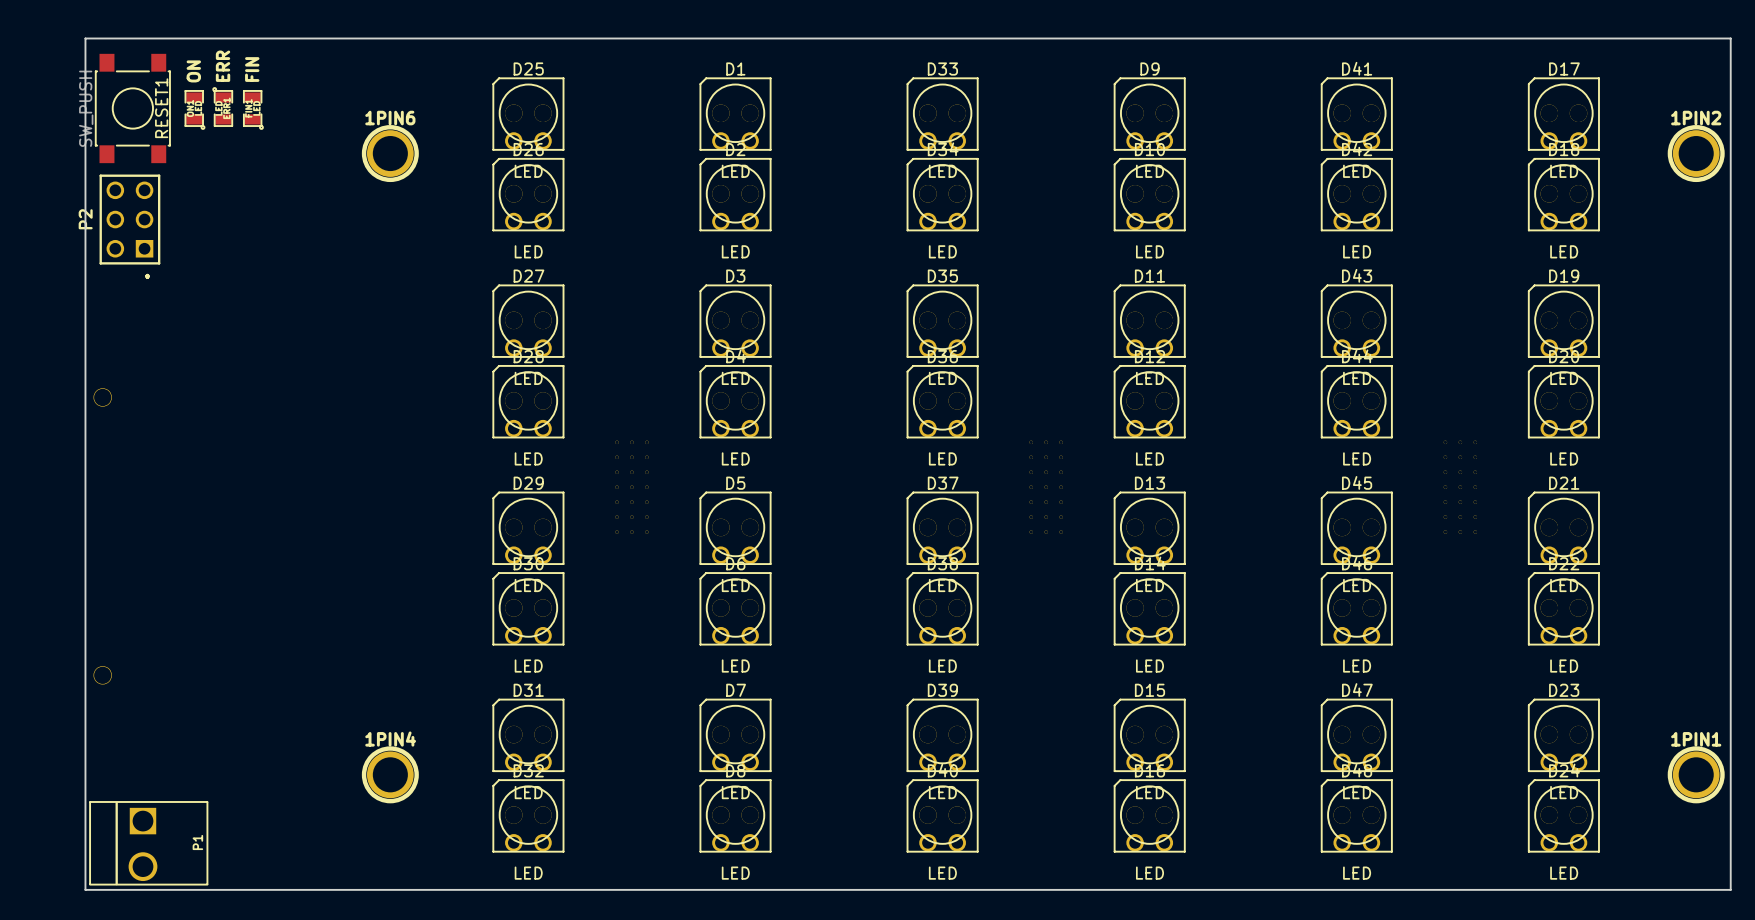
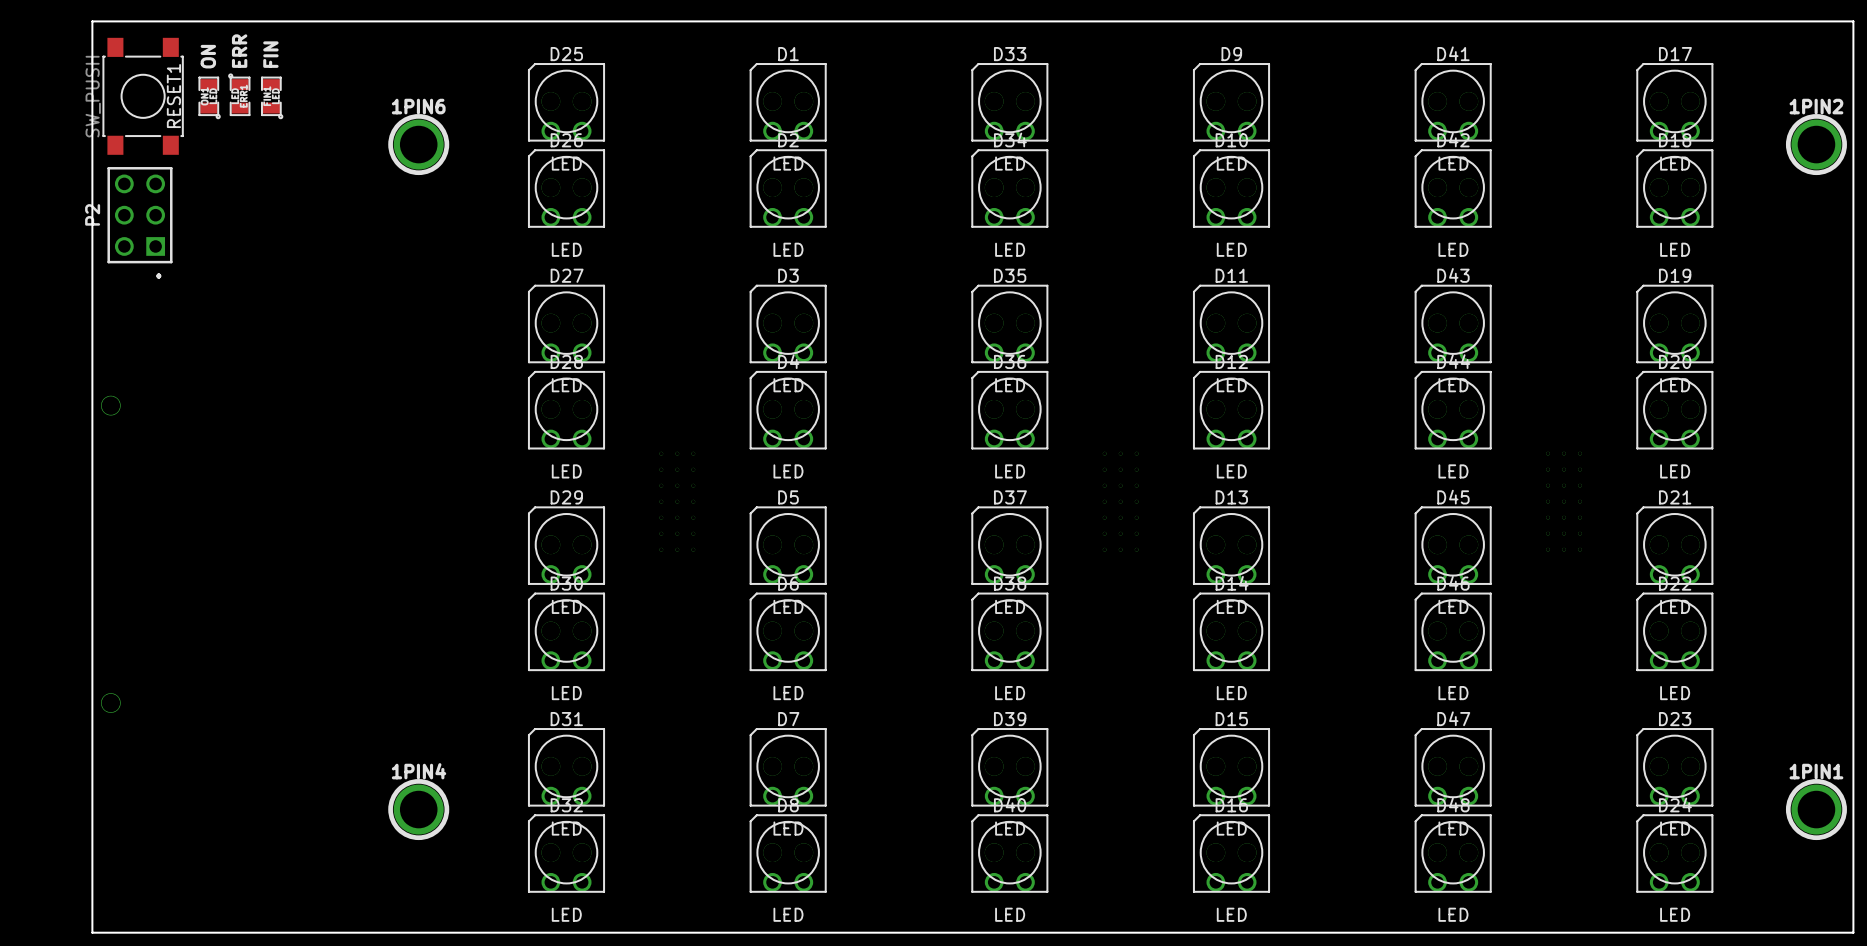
P1: (148, 843) -> none

